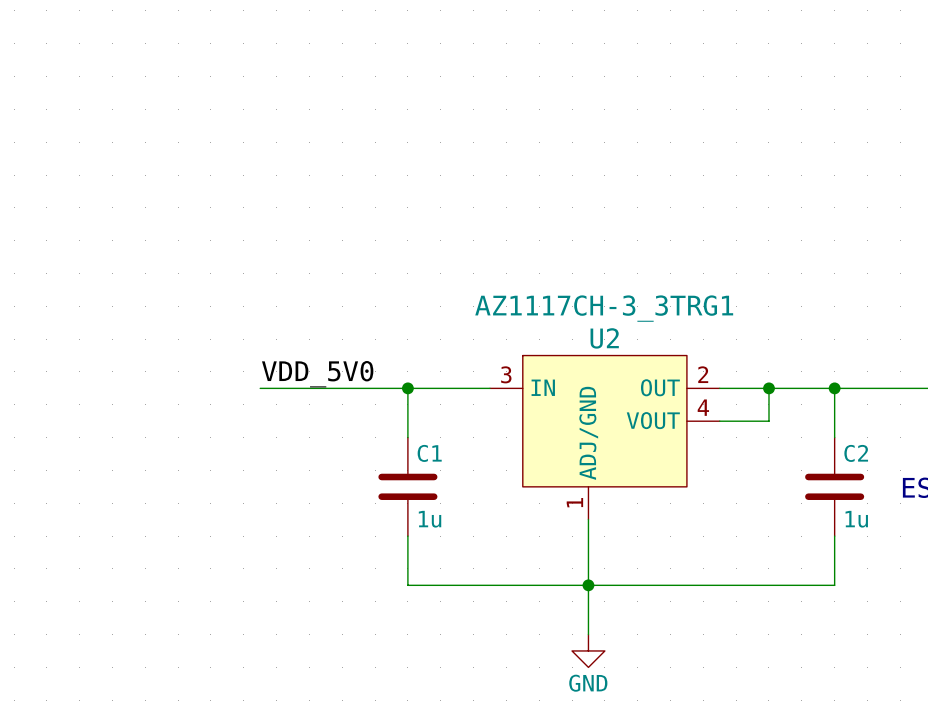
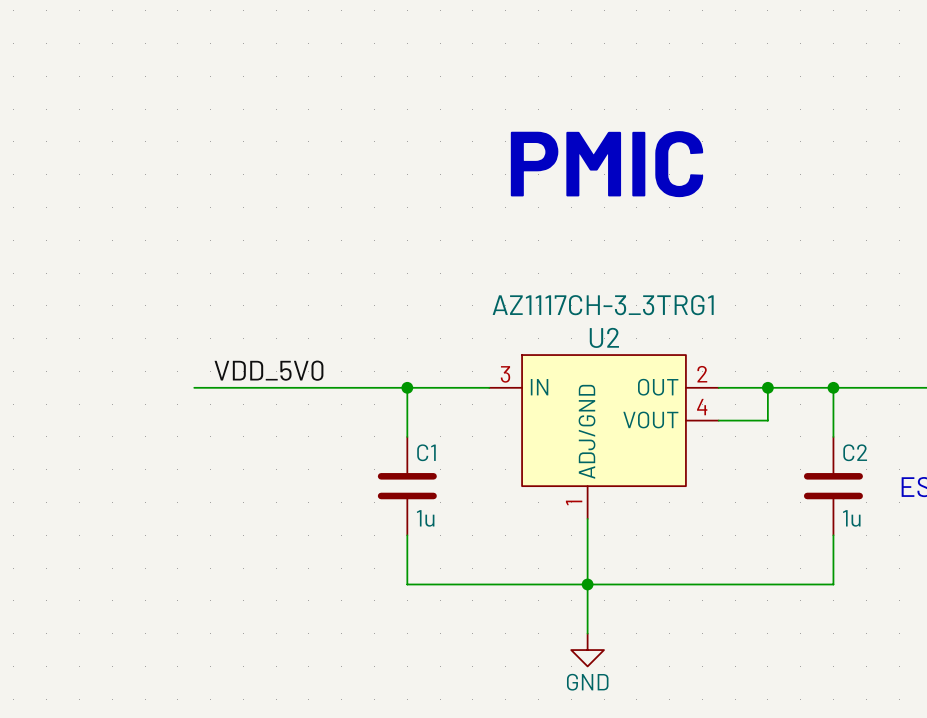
text: none -> PMIC (606, 164)
label position: VDD_5V0 (317, 374) -> VDD_5V0 (269, 370)
wire: none -> (194, 387) (259, 387)

